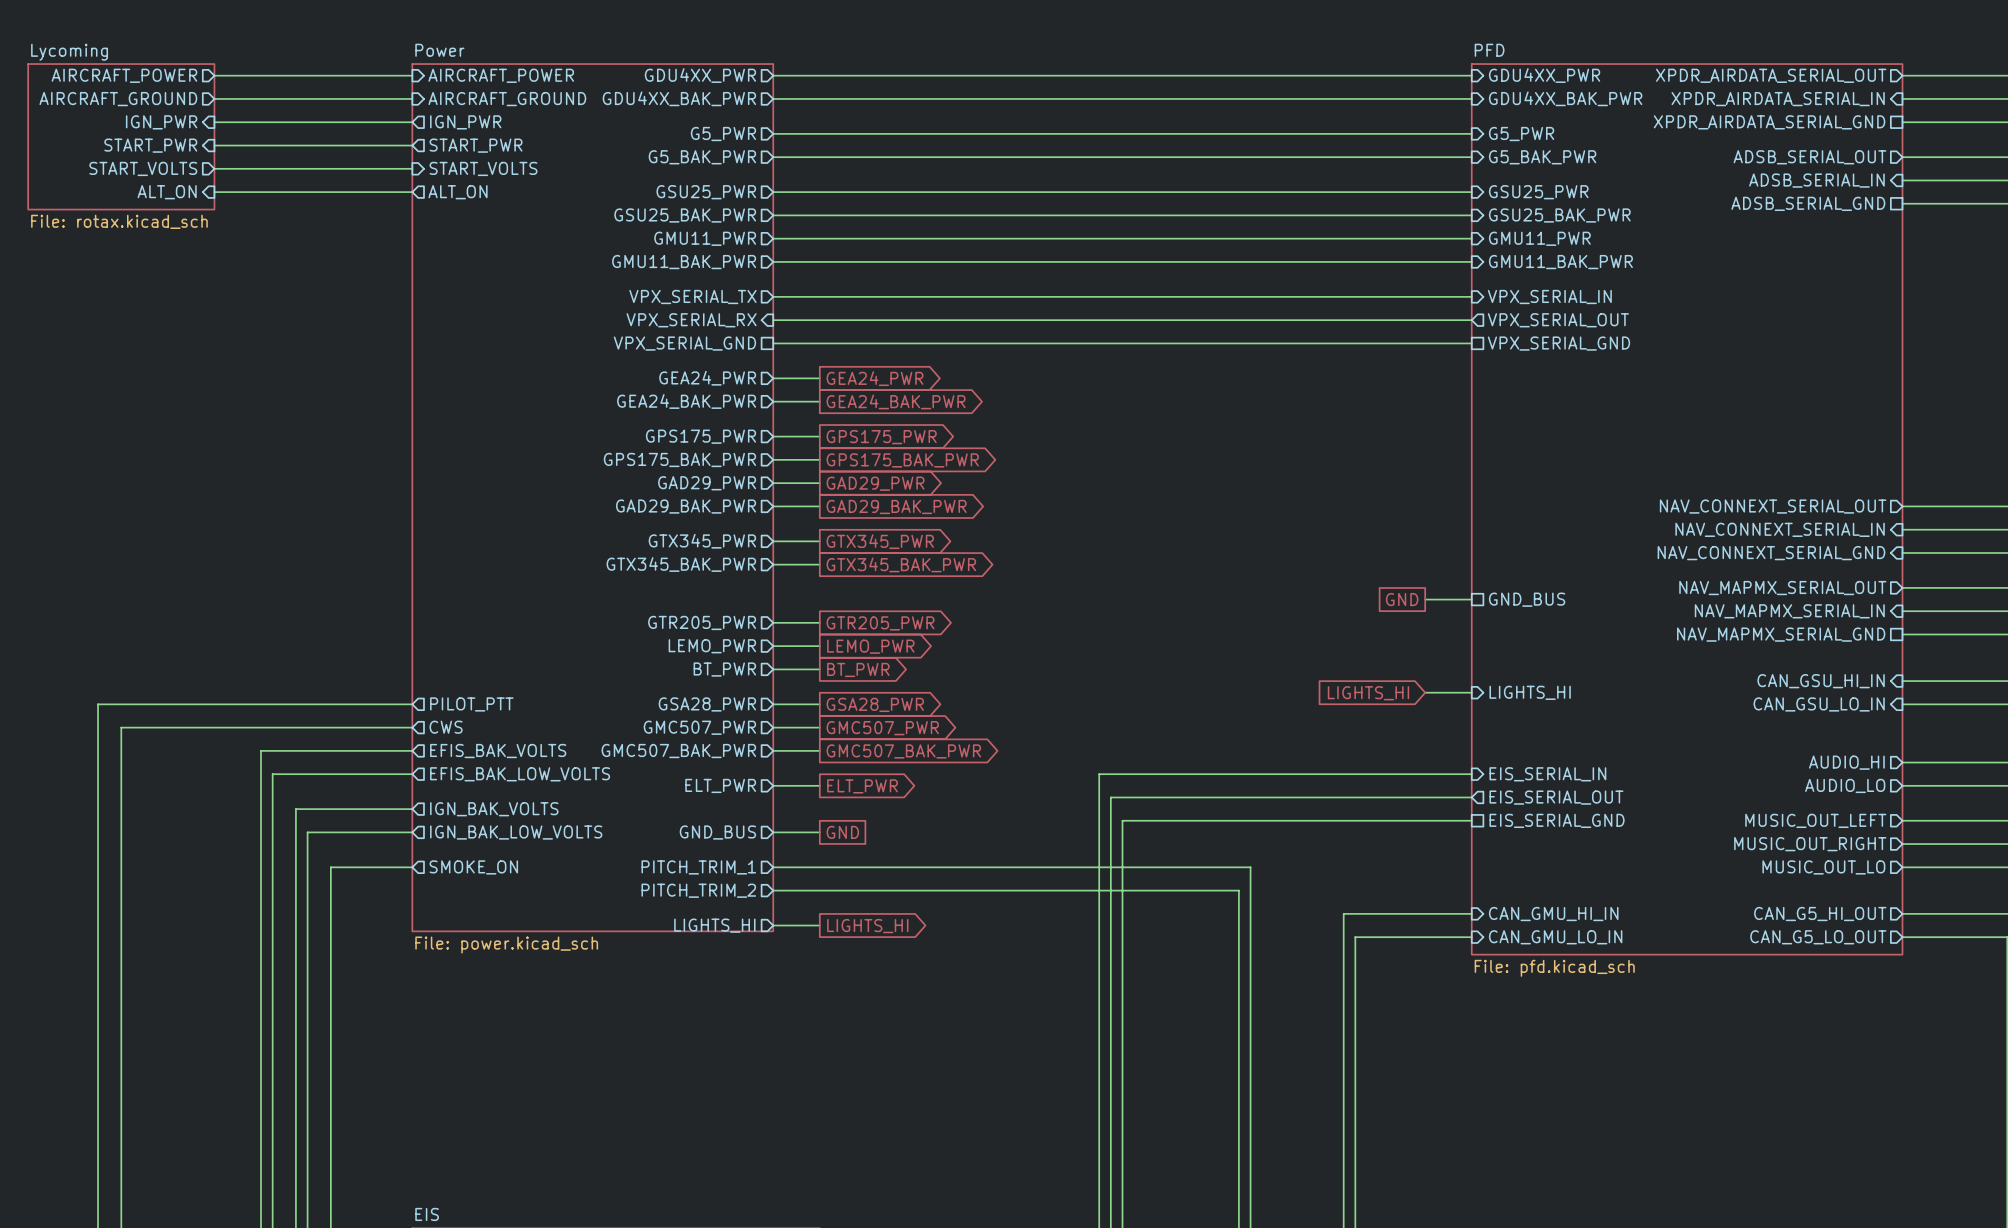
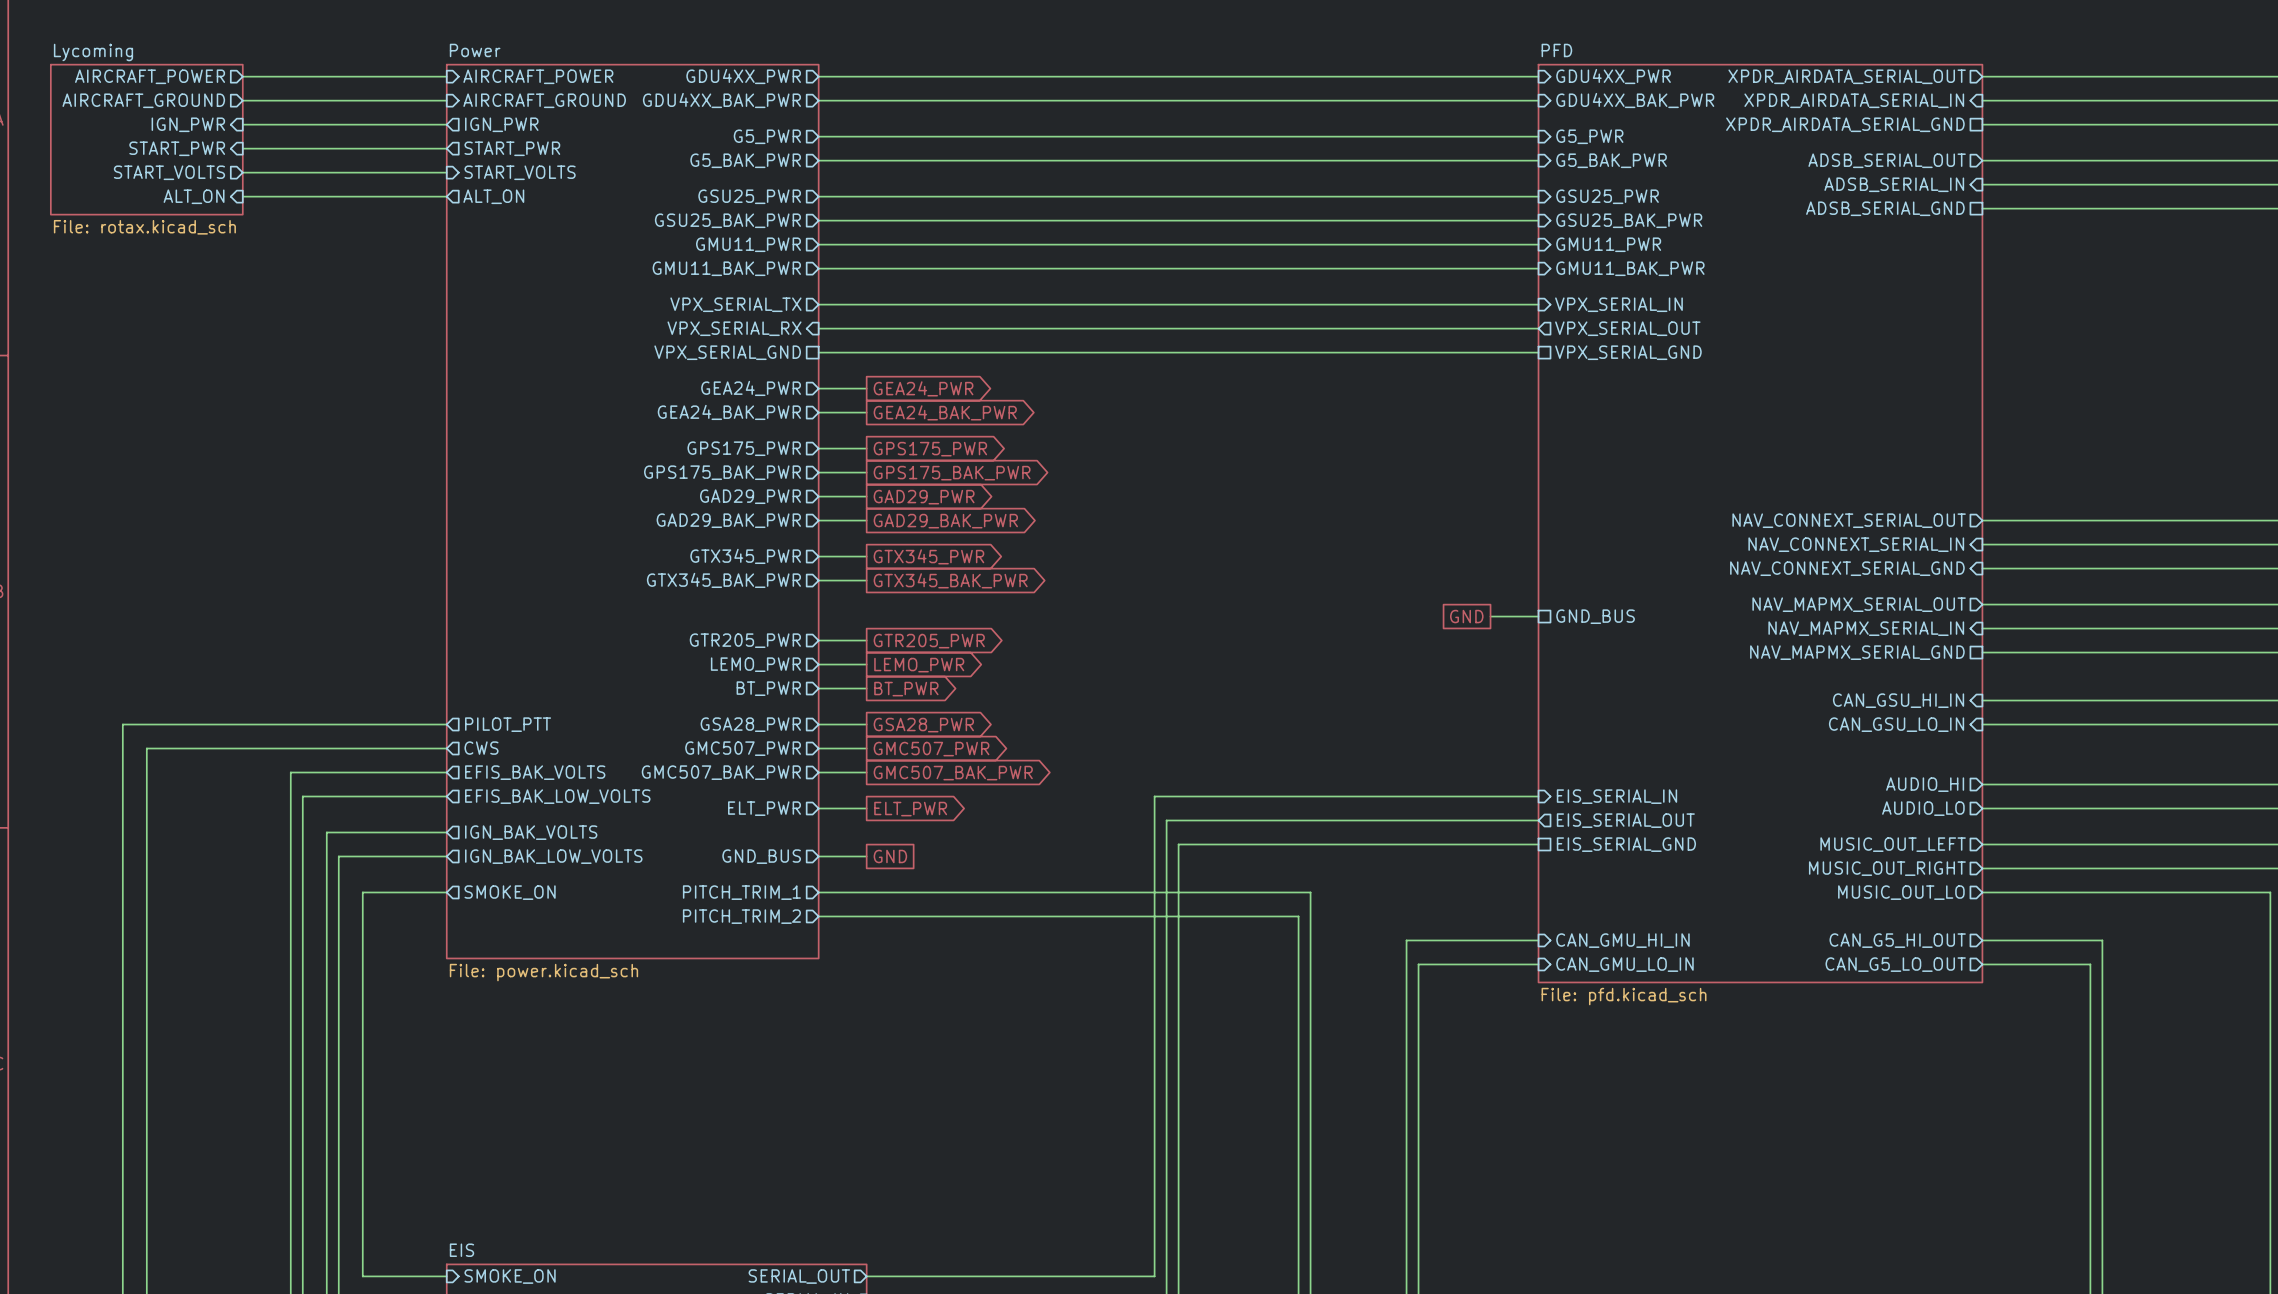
wire: (1425, 692) (1471, 692) -> none
sheet pin: LIGHTS_HI (1530, 692) -> none
global label: LIGHTS_HI (1368, 693) -> none
sheet pin: LIGHTS_HI (714, 925) -> none
wire: (773, 925) (819, 925) -> none
global label: LIGHTS_HI (867, 926) -> none

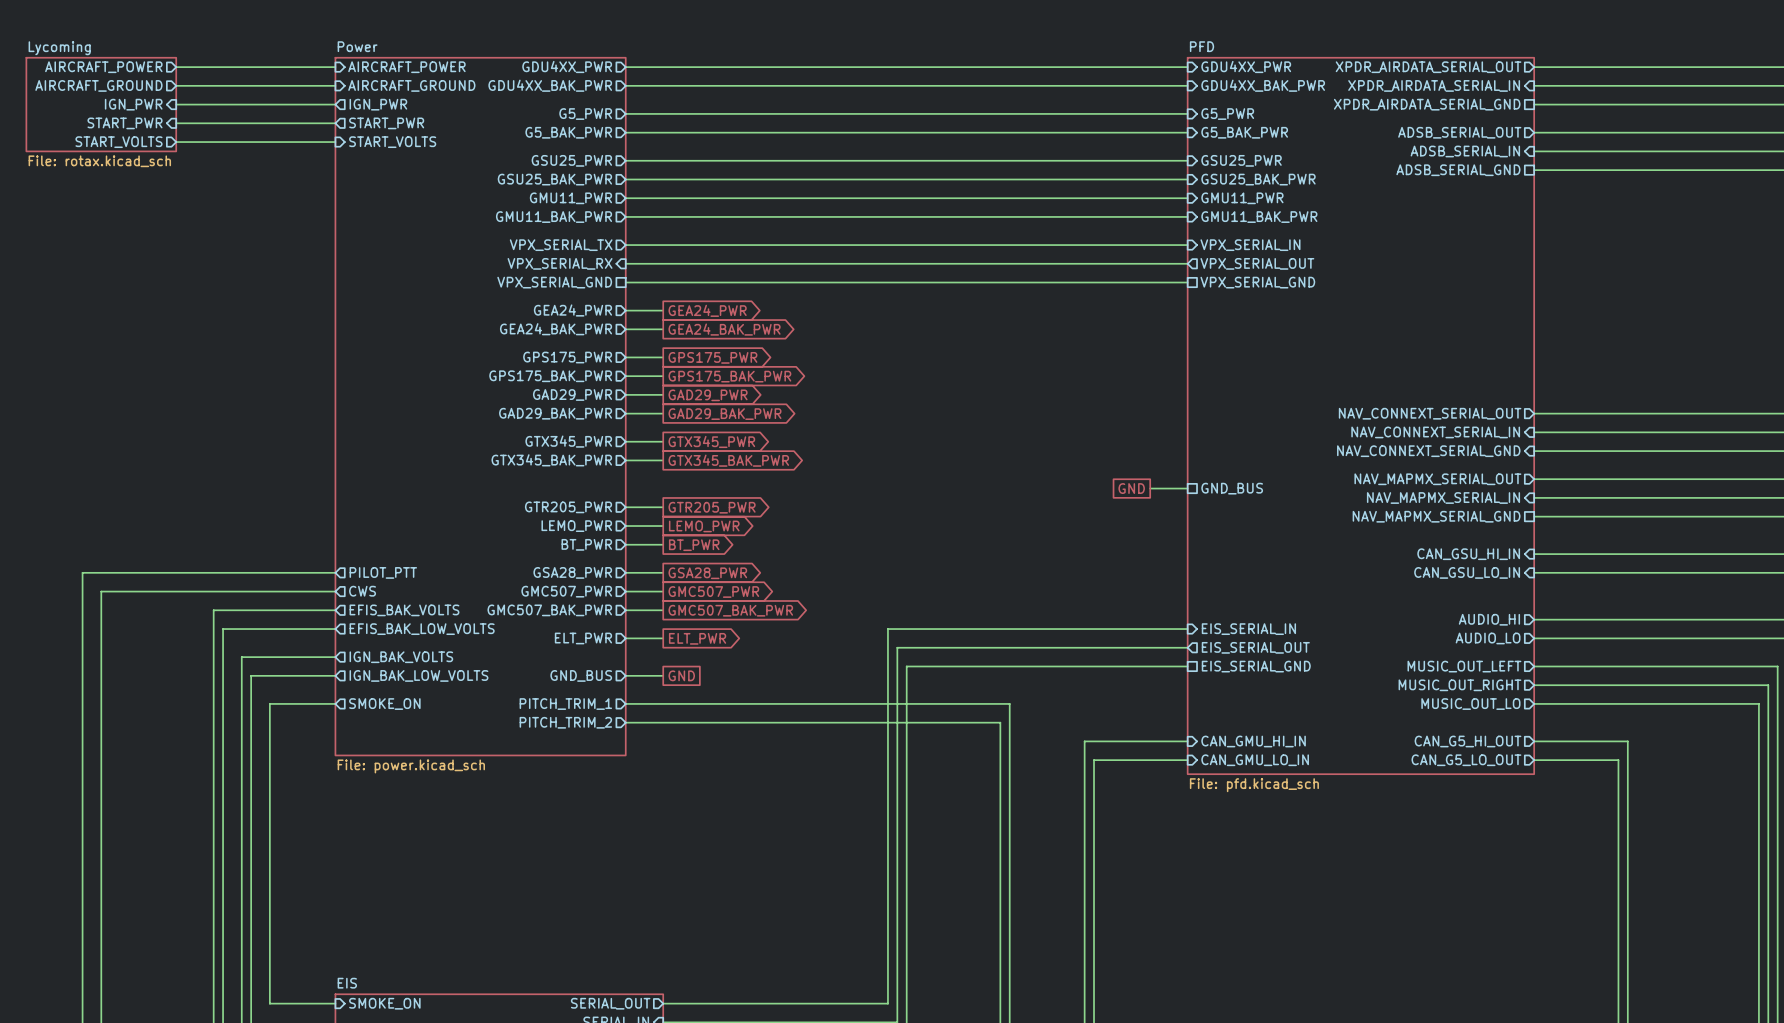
sheet Lycoming: none -> File: rotax.kicad_sch (101, 104)
sheet Lycoming: File: rotax.kicad_sch (146, 139) -> none
sheet pin: ALT_ON (194, 196) -> none
wire: (242, 196) (446, 196) -> none
sheet pin: ALT_ON (493, 196) -> none

